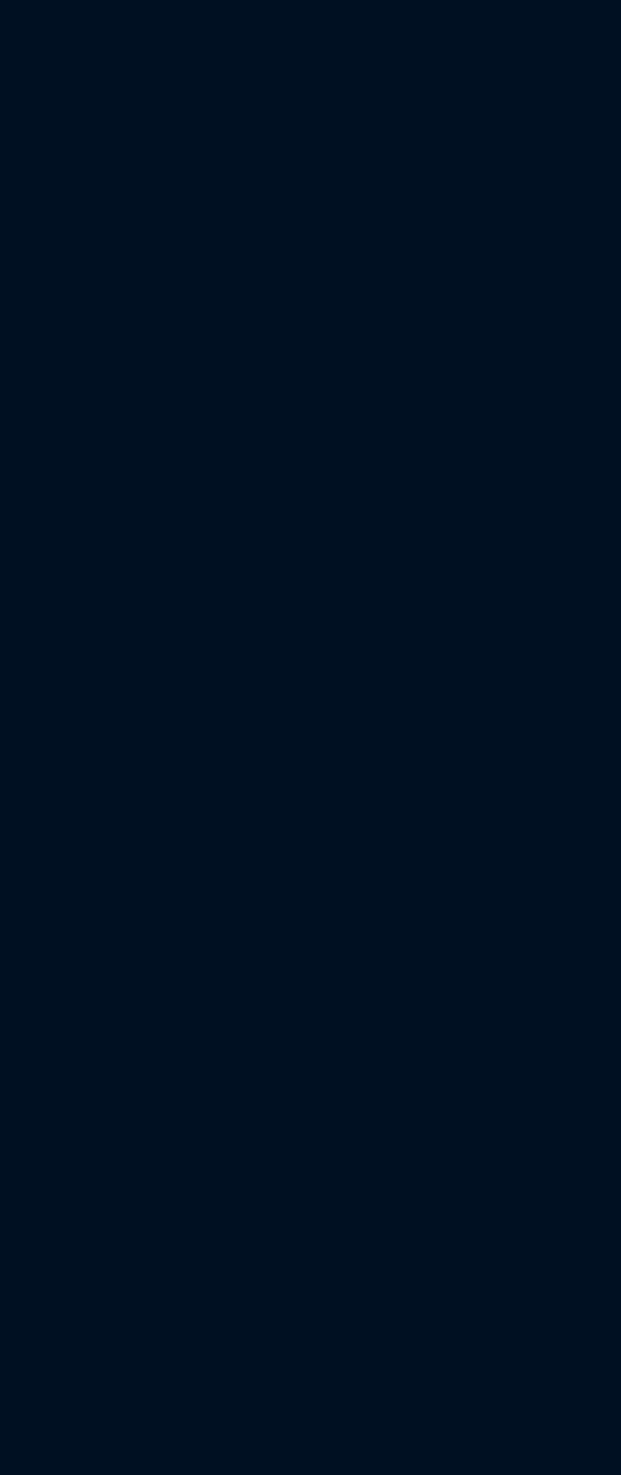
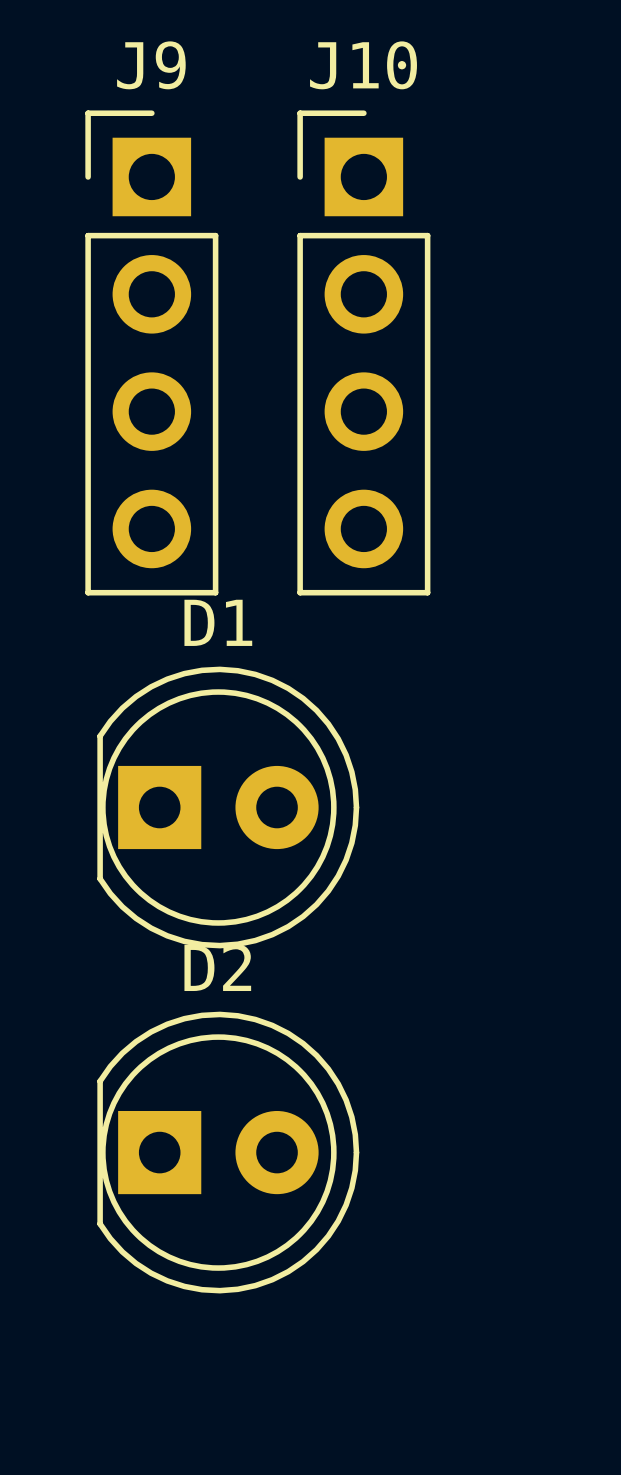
J9: none -> (151, 352)
J10: none -> (363, 352)
D1: none -> (228, 807)
D2: none -> (228, 1152)

